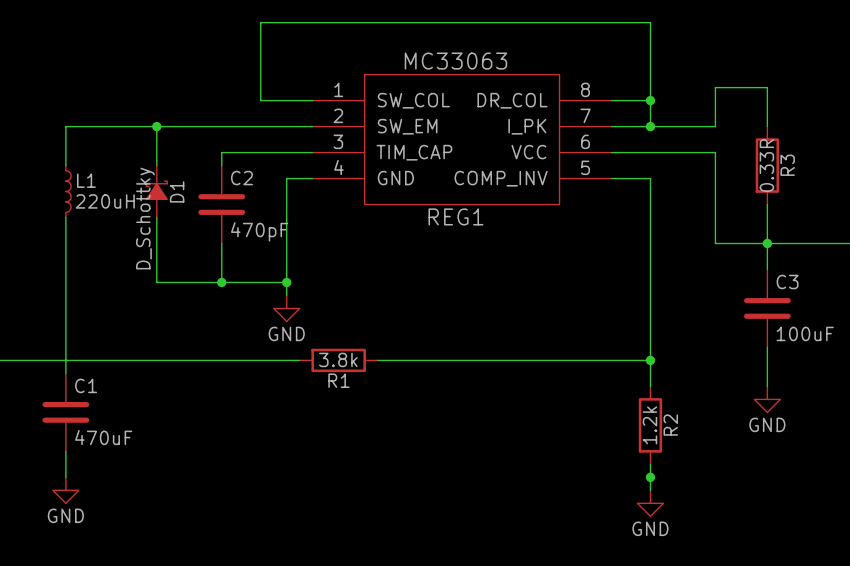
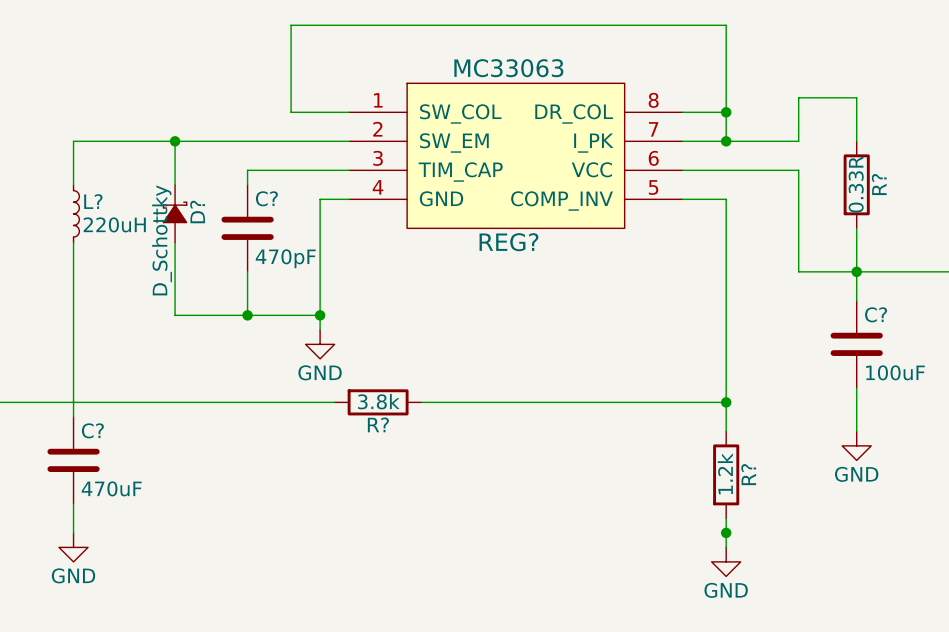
R3 name: R3 (787, 165) -> R? (879, 184)
C2 name: C2 (241, 178) -> C? (266, 198)
L1 name: L1 (86, 180) -> L? (93, 201)
D1 name: D1 (177, 191) -> D? (197, 211)
REG1 name: REG1 (455, 216) -> REG? (508, 242)
C3 name: C3 (787, 281) -> C? (876, 314)
R1 name: R1 (338, 380) -> R? (378, 424)
C1 name: C1 (86, 385) -> C? (92, 430)
R2 name: R2 (670, 425) -> R? (748, 474)

